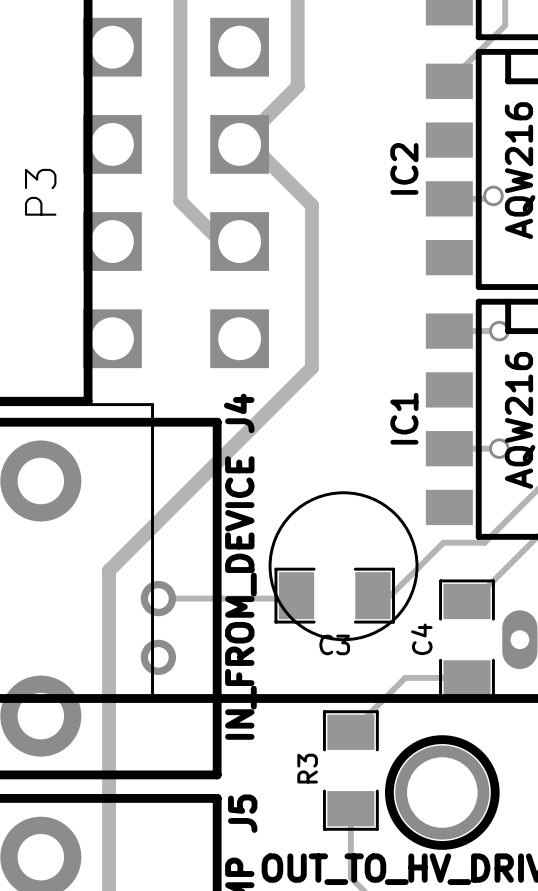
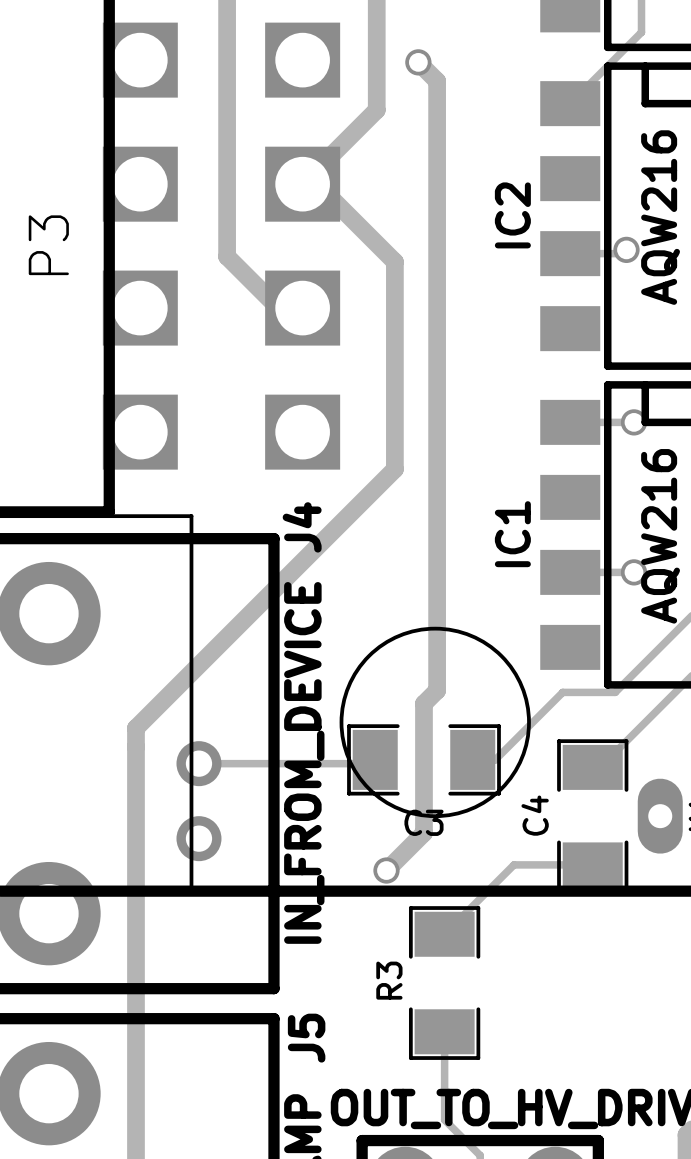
track: none -> (418, 62) (437, 81) (437, 690) (423, 703) (423, 833) (386, 870)
via: none -> (418, 62)
via: none -> (386, 870)
part: (442, 792) -> none

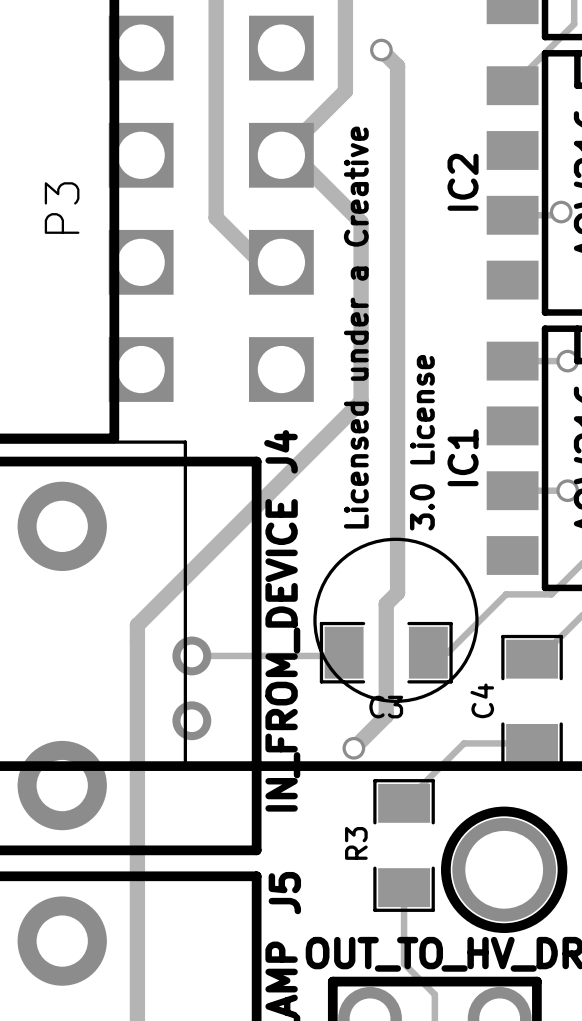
text: none -> Licensed under a Creative (356, 327)
text: none -> 3.0 License (422, 442)
part: none -> (504, 869)

